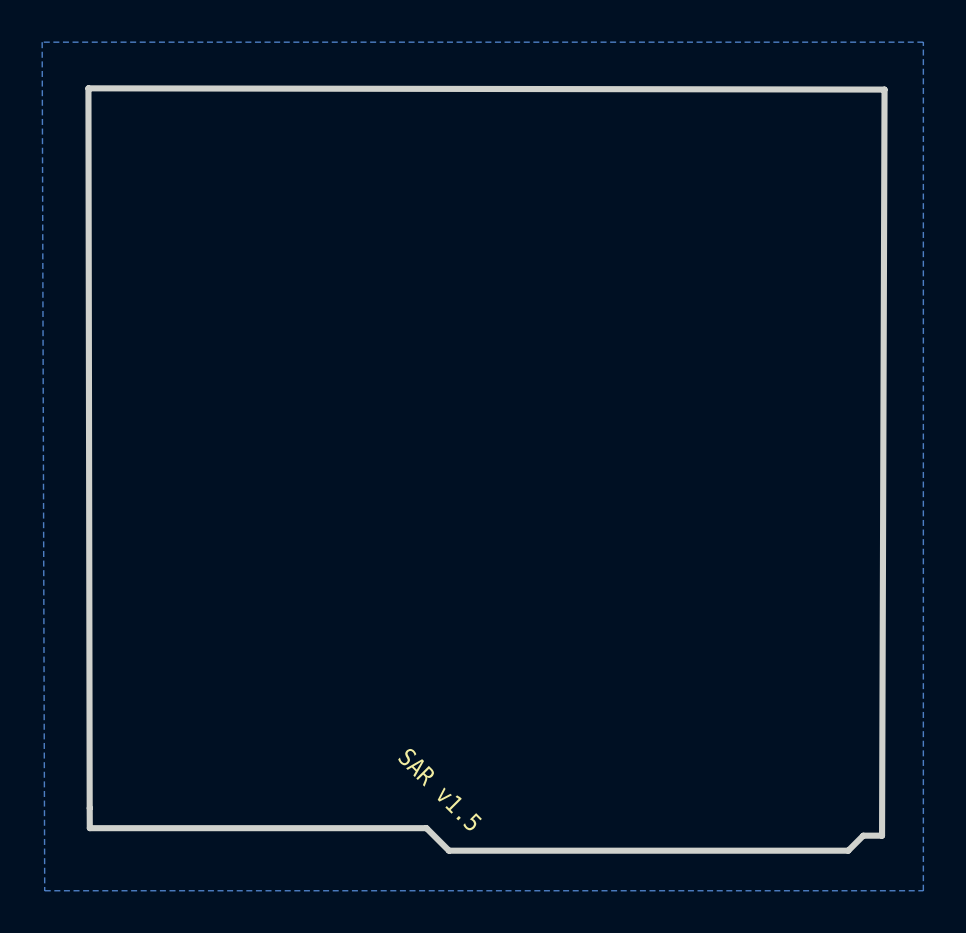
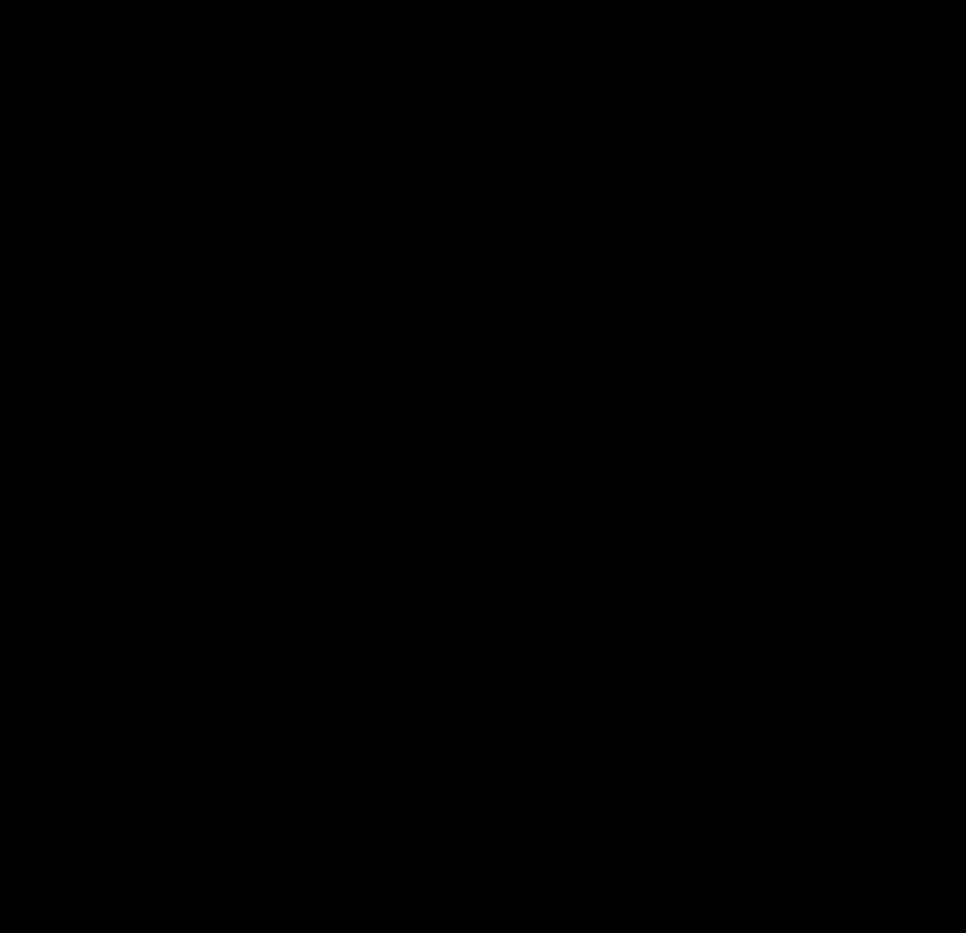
zone outline: (923, 42) (42, 42) (44, 890) (923, 890) (923, 42) -> none
board edge: (88, 88) (89, 828) (426, 828) (449, 850) (848, 850) (863, 835) (882, 835) (884, 89) (88, 88) -> none
text: SAR v1.5 (440, 789) -> none

